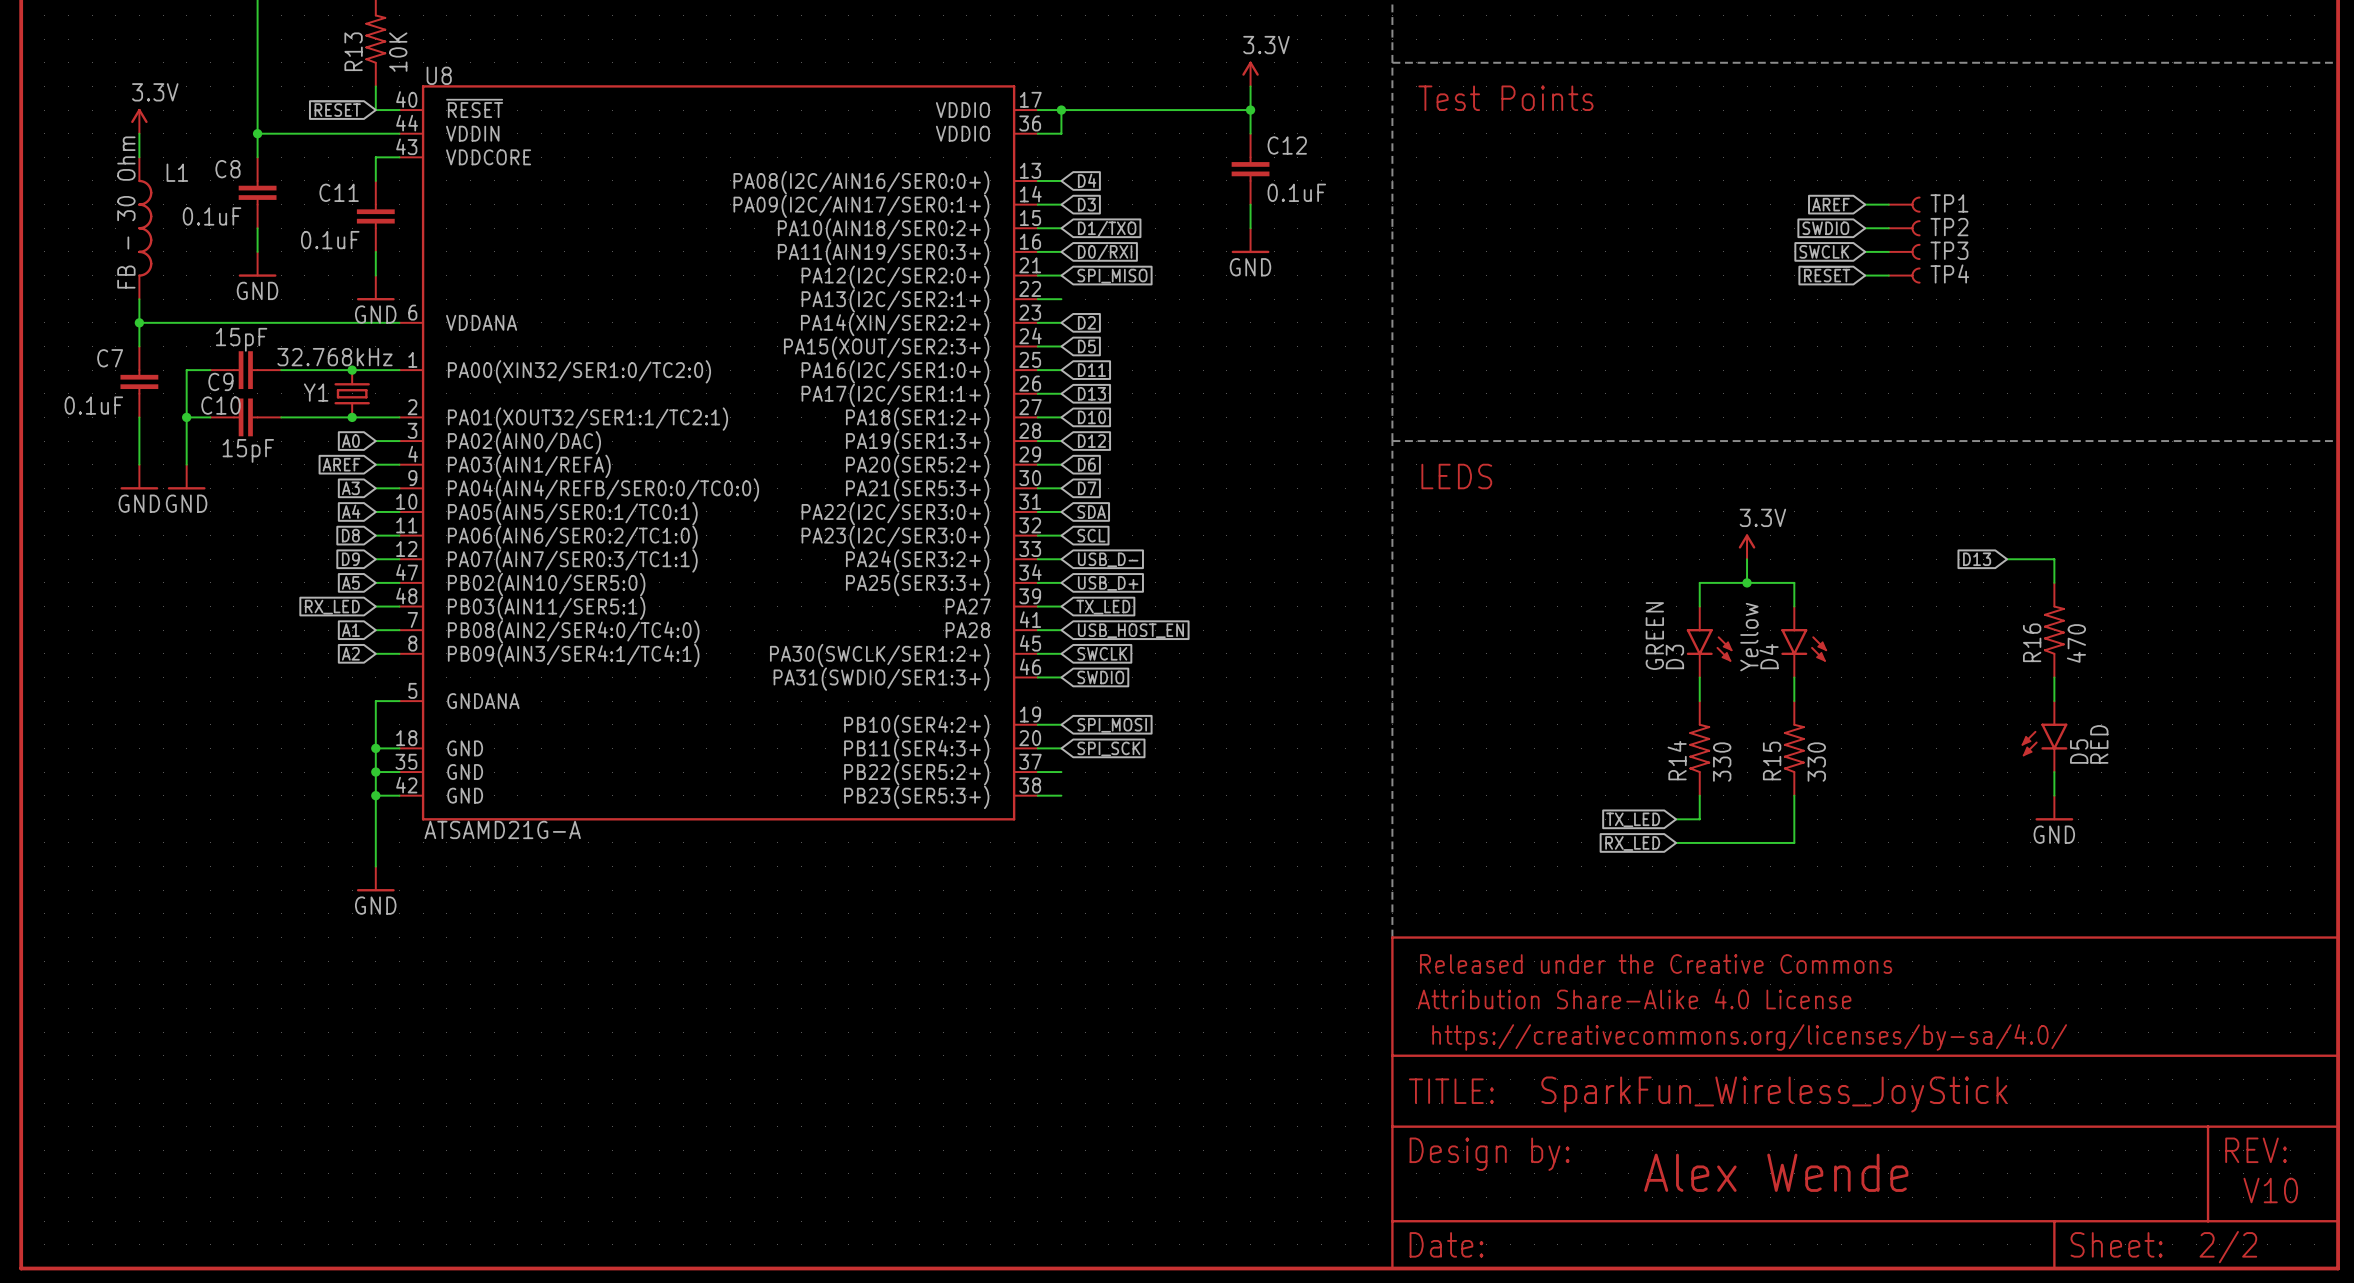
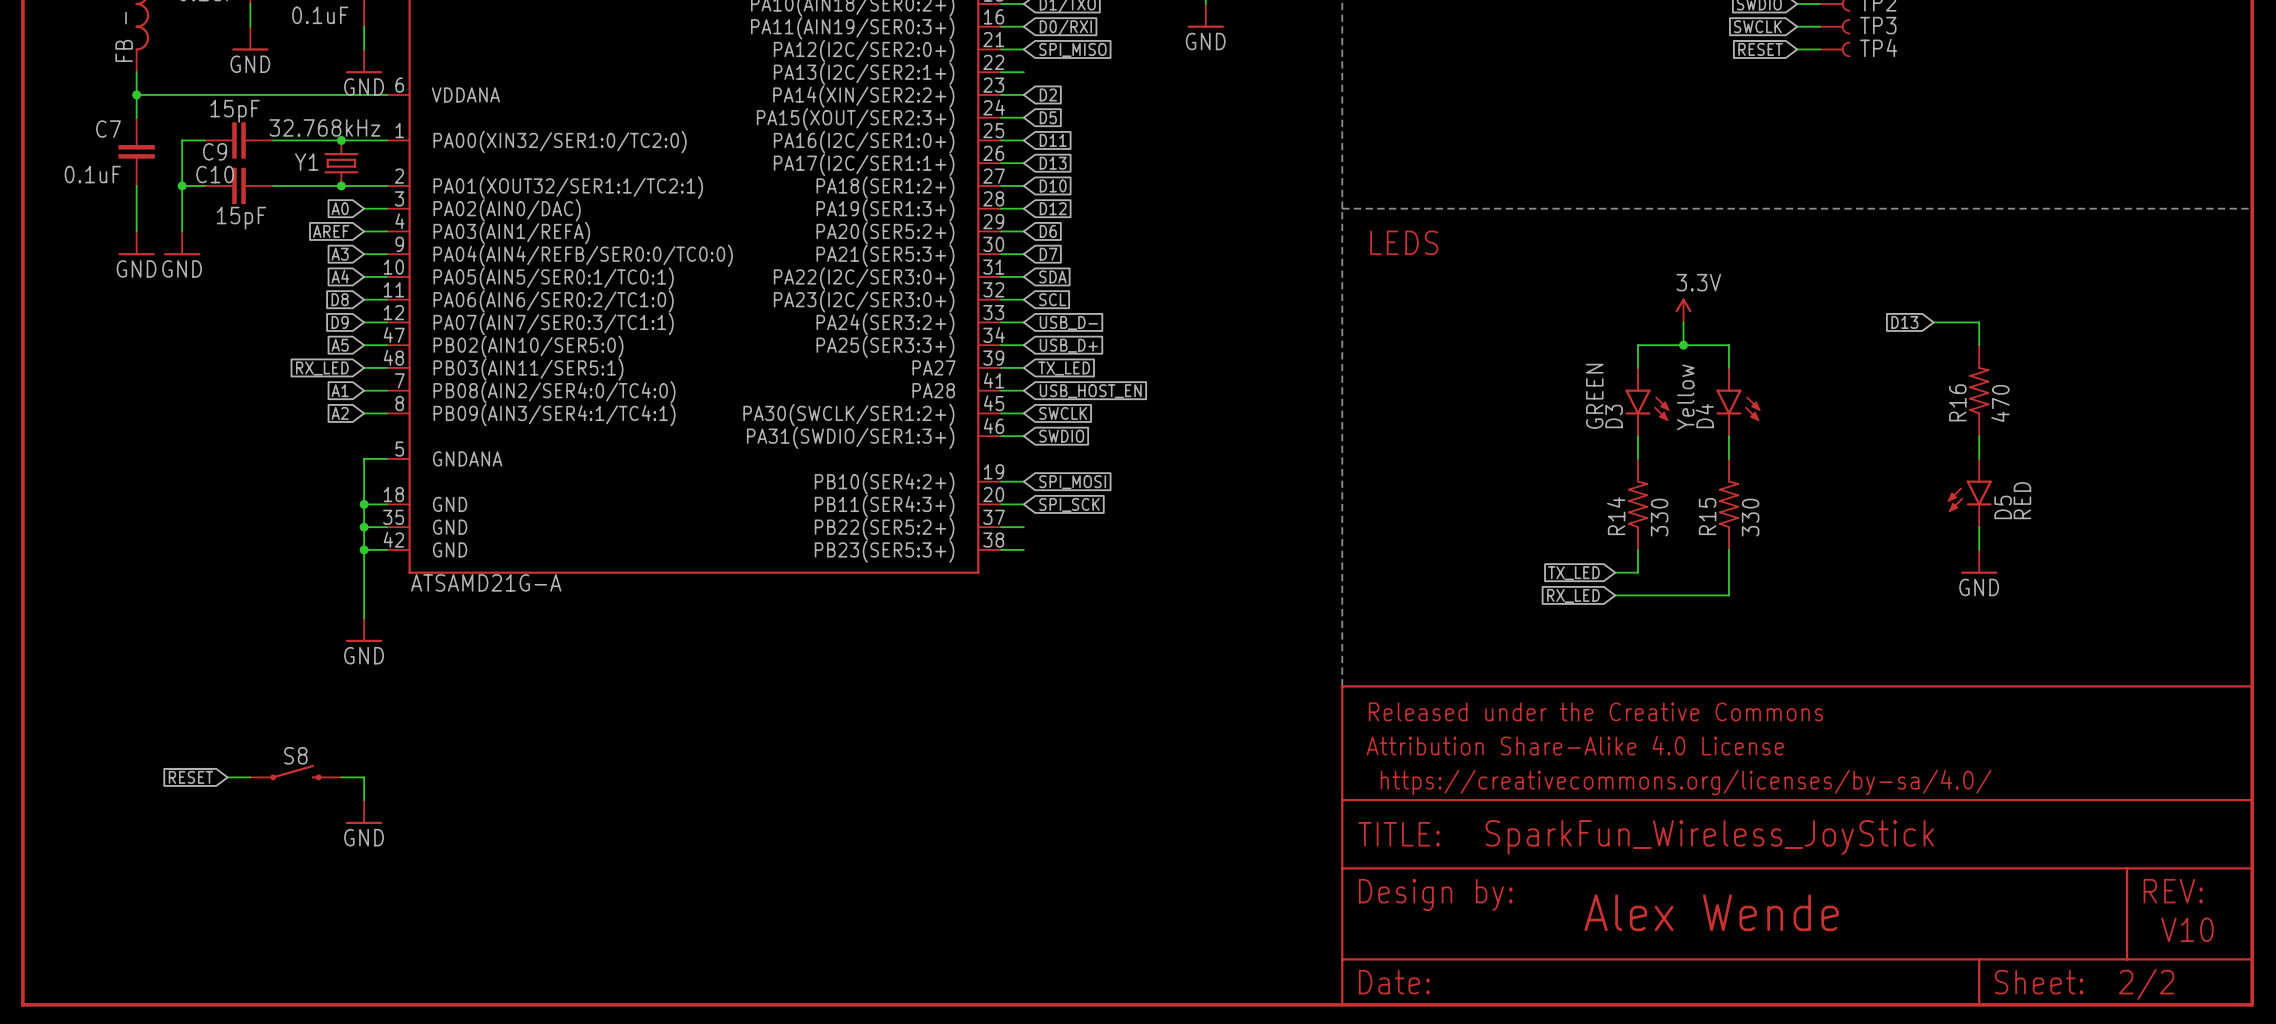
S8: none -> (295, 772)
global label: none -> ~{RESET} (190, 776)
wire: none -> (227, 777) (250, 777)
wire: none -> (341, 777) (364, 777) (364, 800)
power symbol: none -> GND (364, 812)

